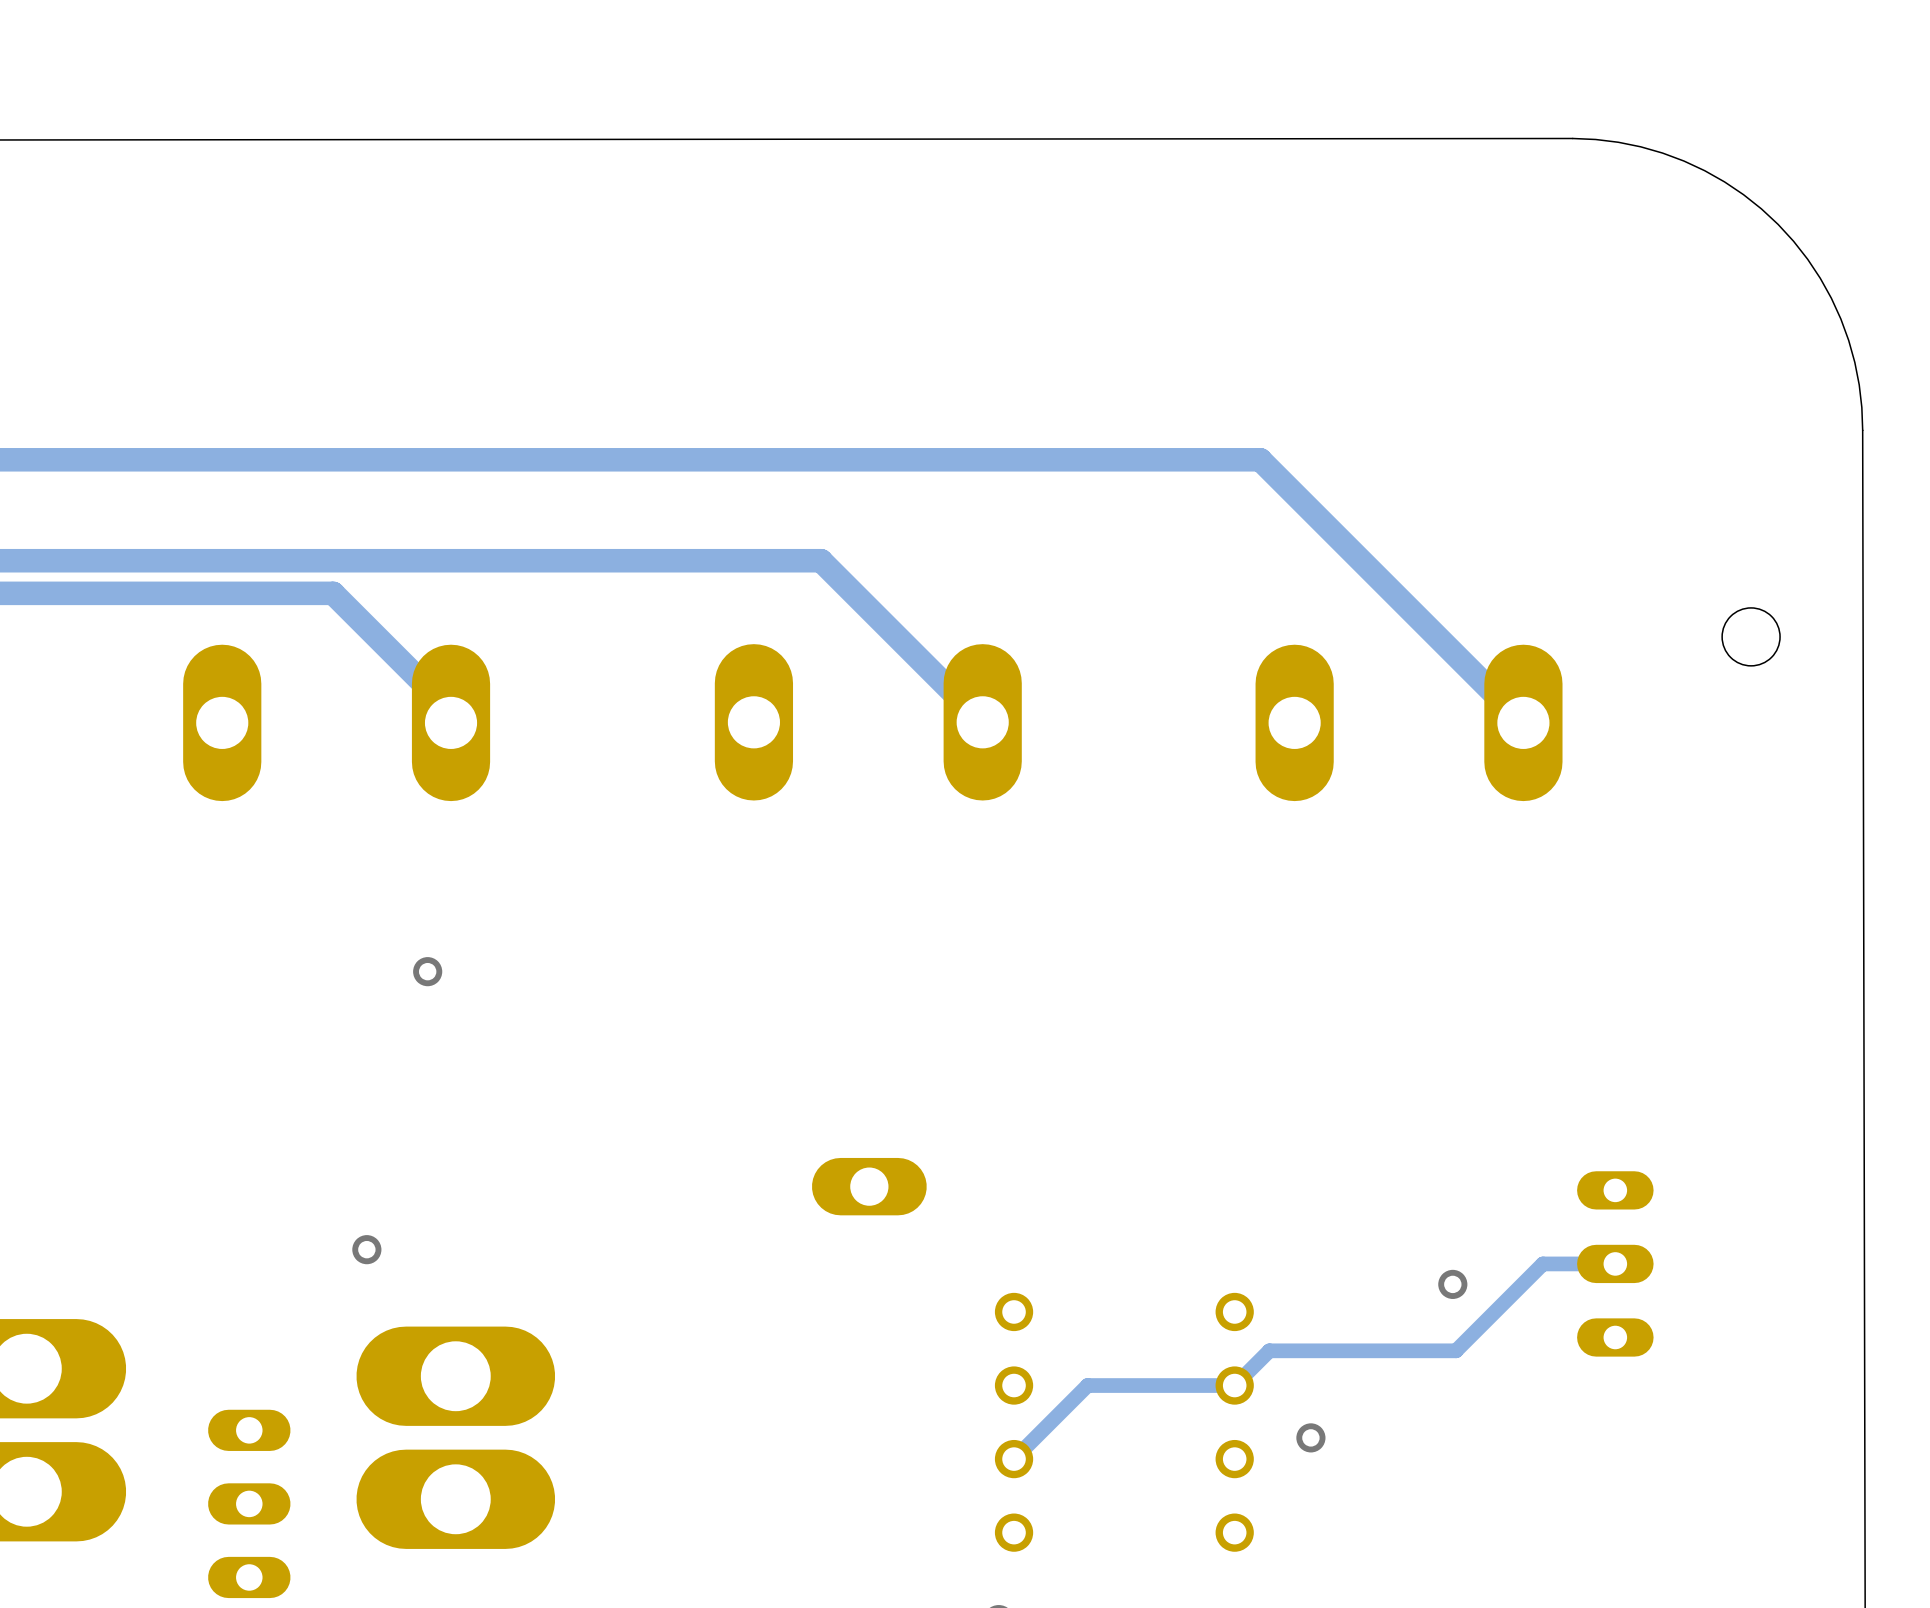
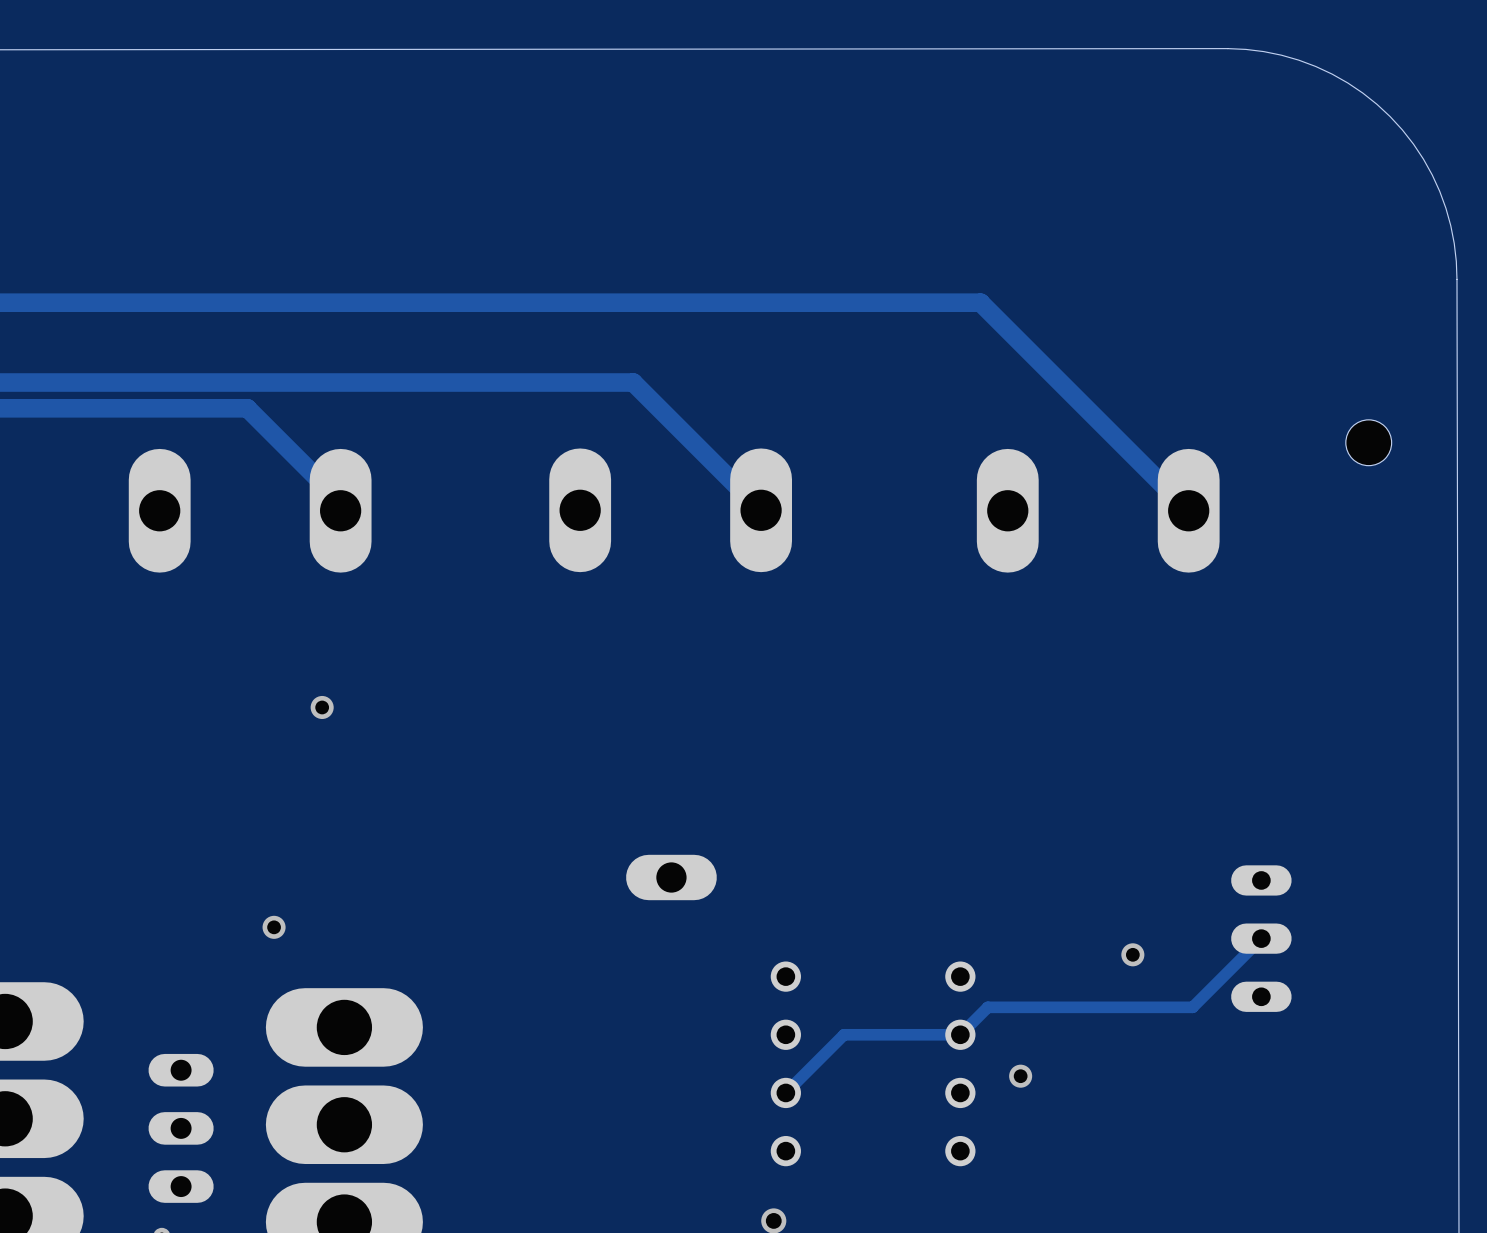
track: (1615, 1263) (1542, 1263) (1456, 1350) -> (1261, 938) (1192, 1007) (1135, 1007)

